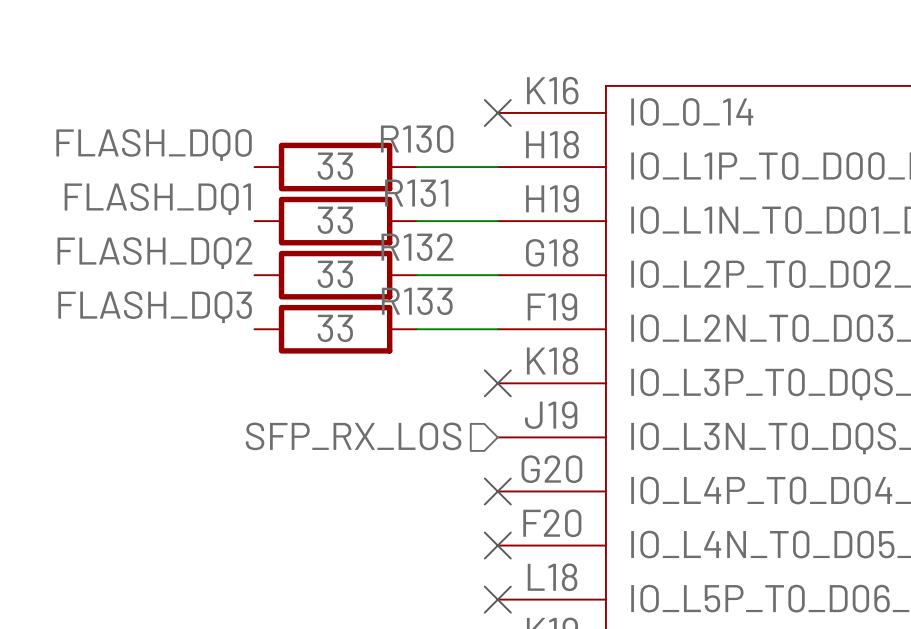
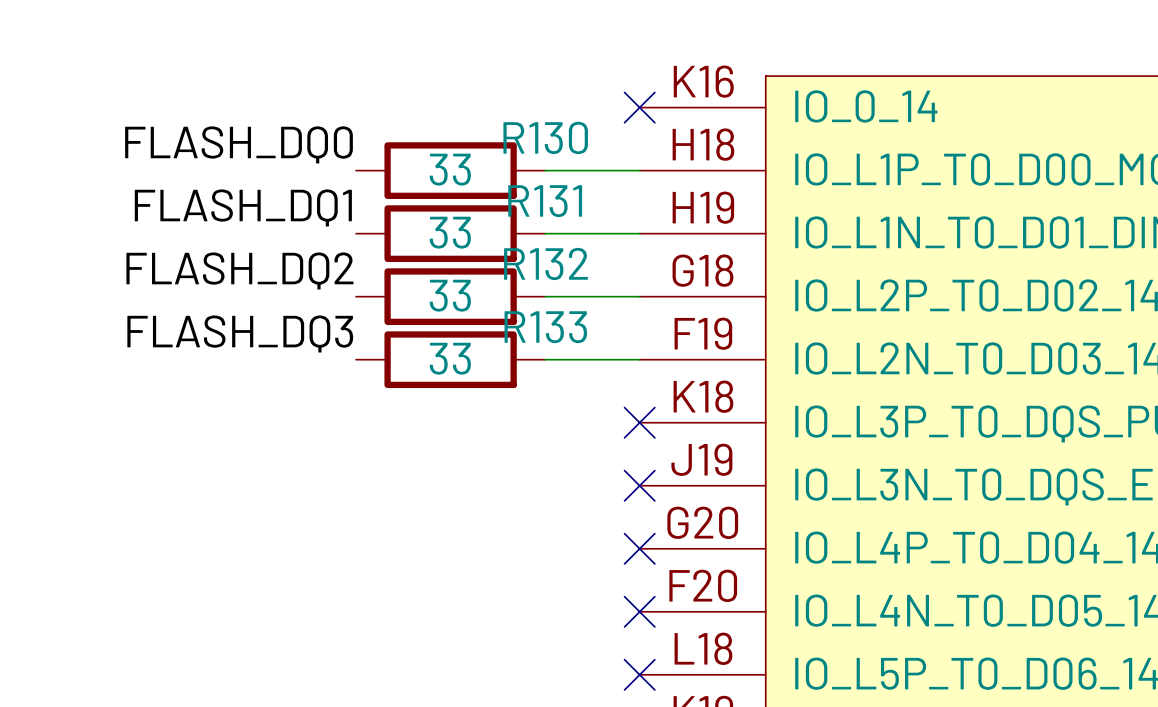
hierarchical label: SFP_RX_LOS (353, 436) -> none
no-connect mark: none -> (639, 485)

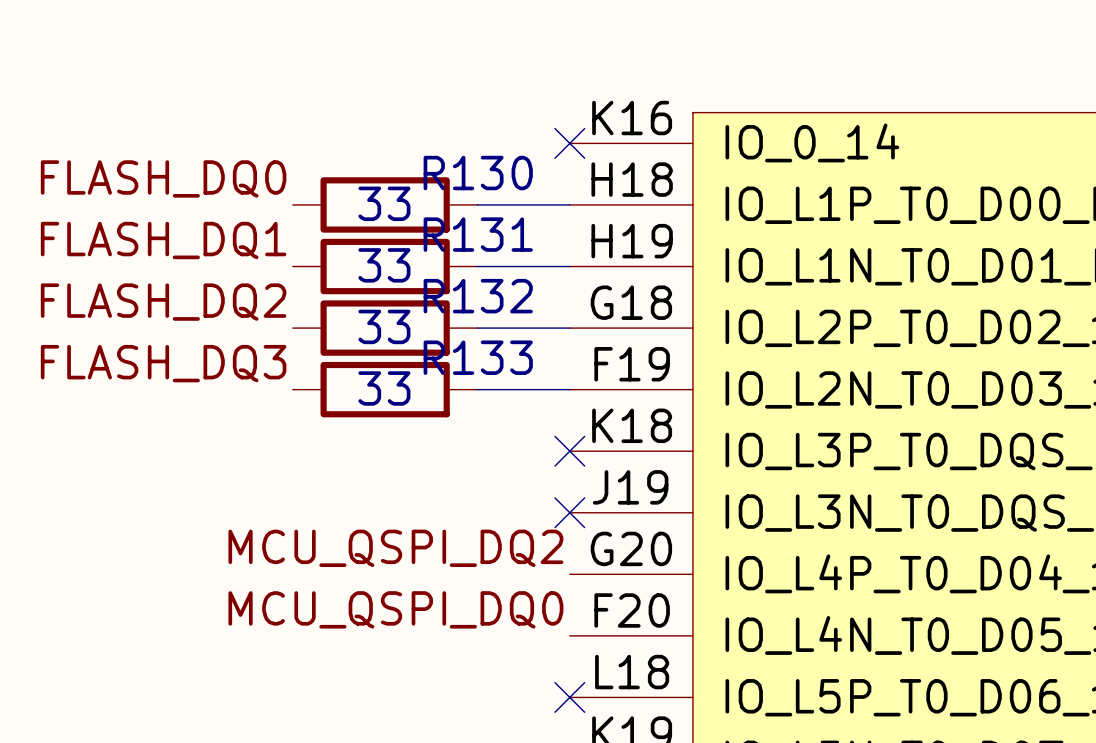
label: none -> MCU_QSPI_DQ2 (395, 548)
no-connect mark: (639, 548) -> none
label: none -> MCU_QSPI_DQ0 (395, 609)
no-connect mark: (639, 611) -> none

